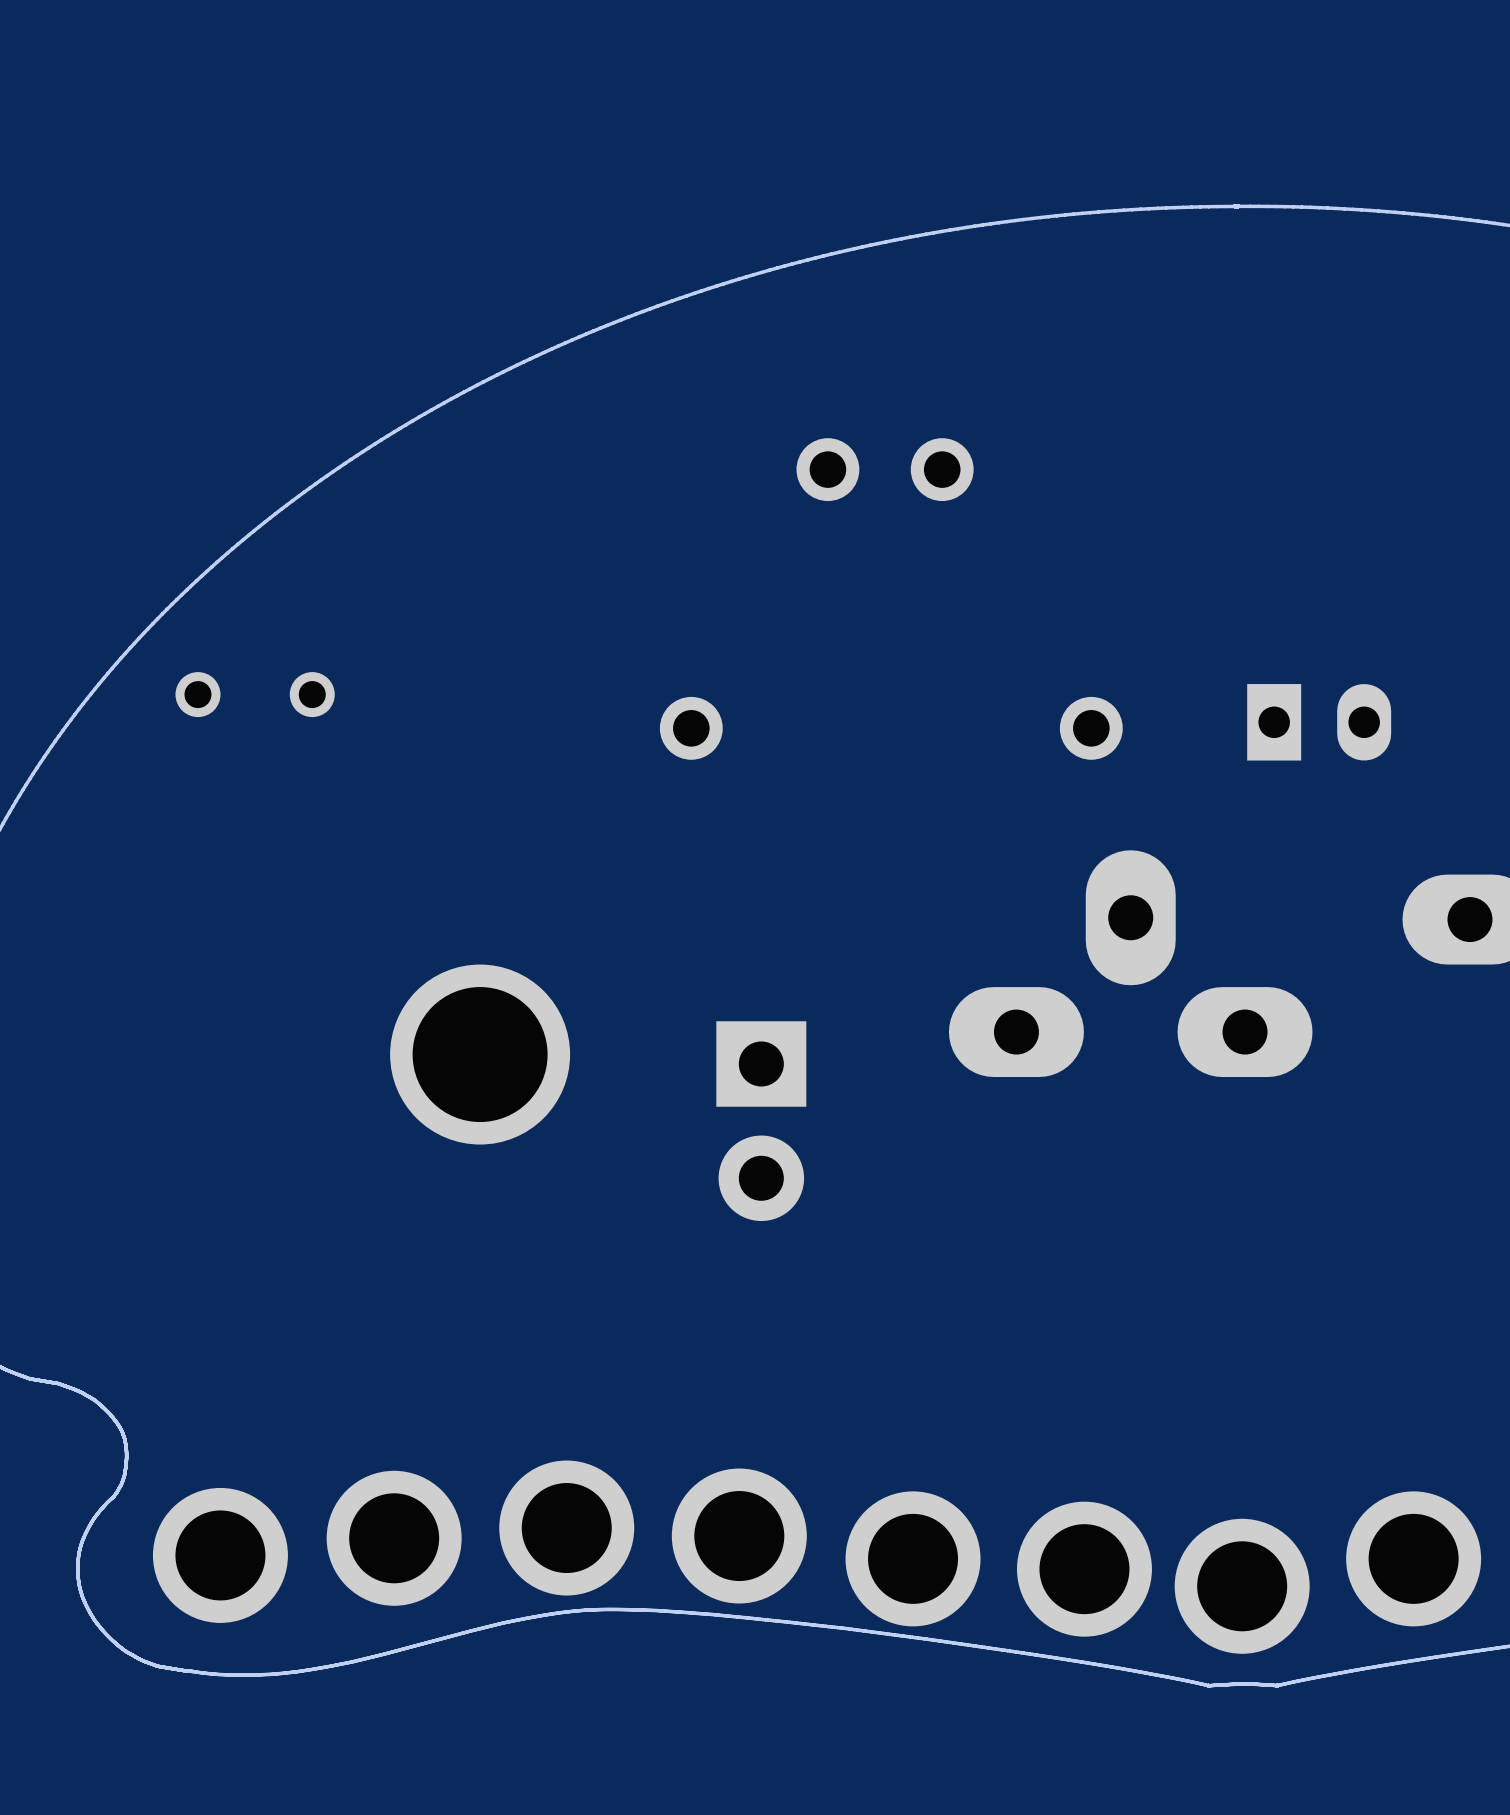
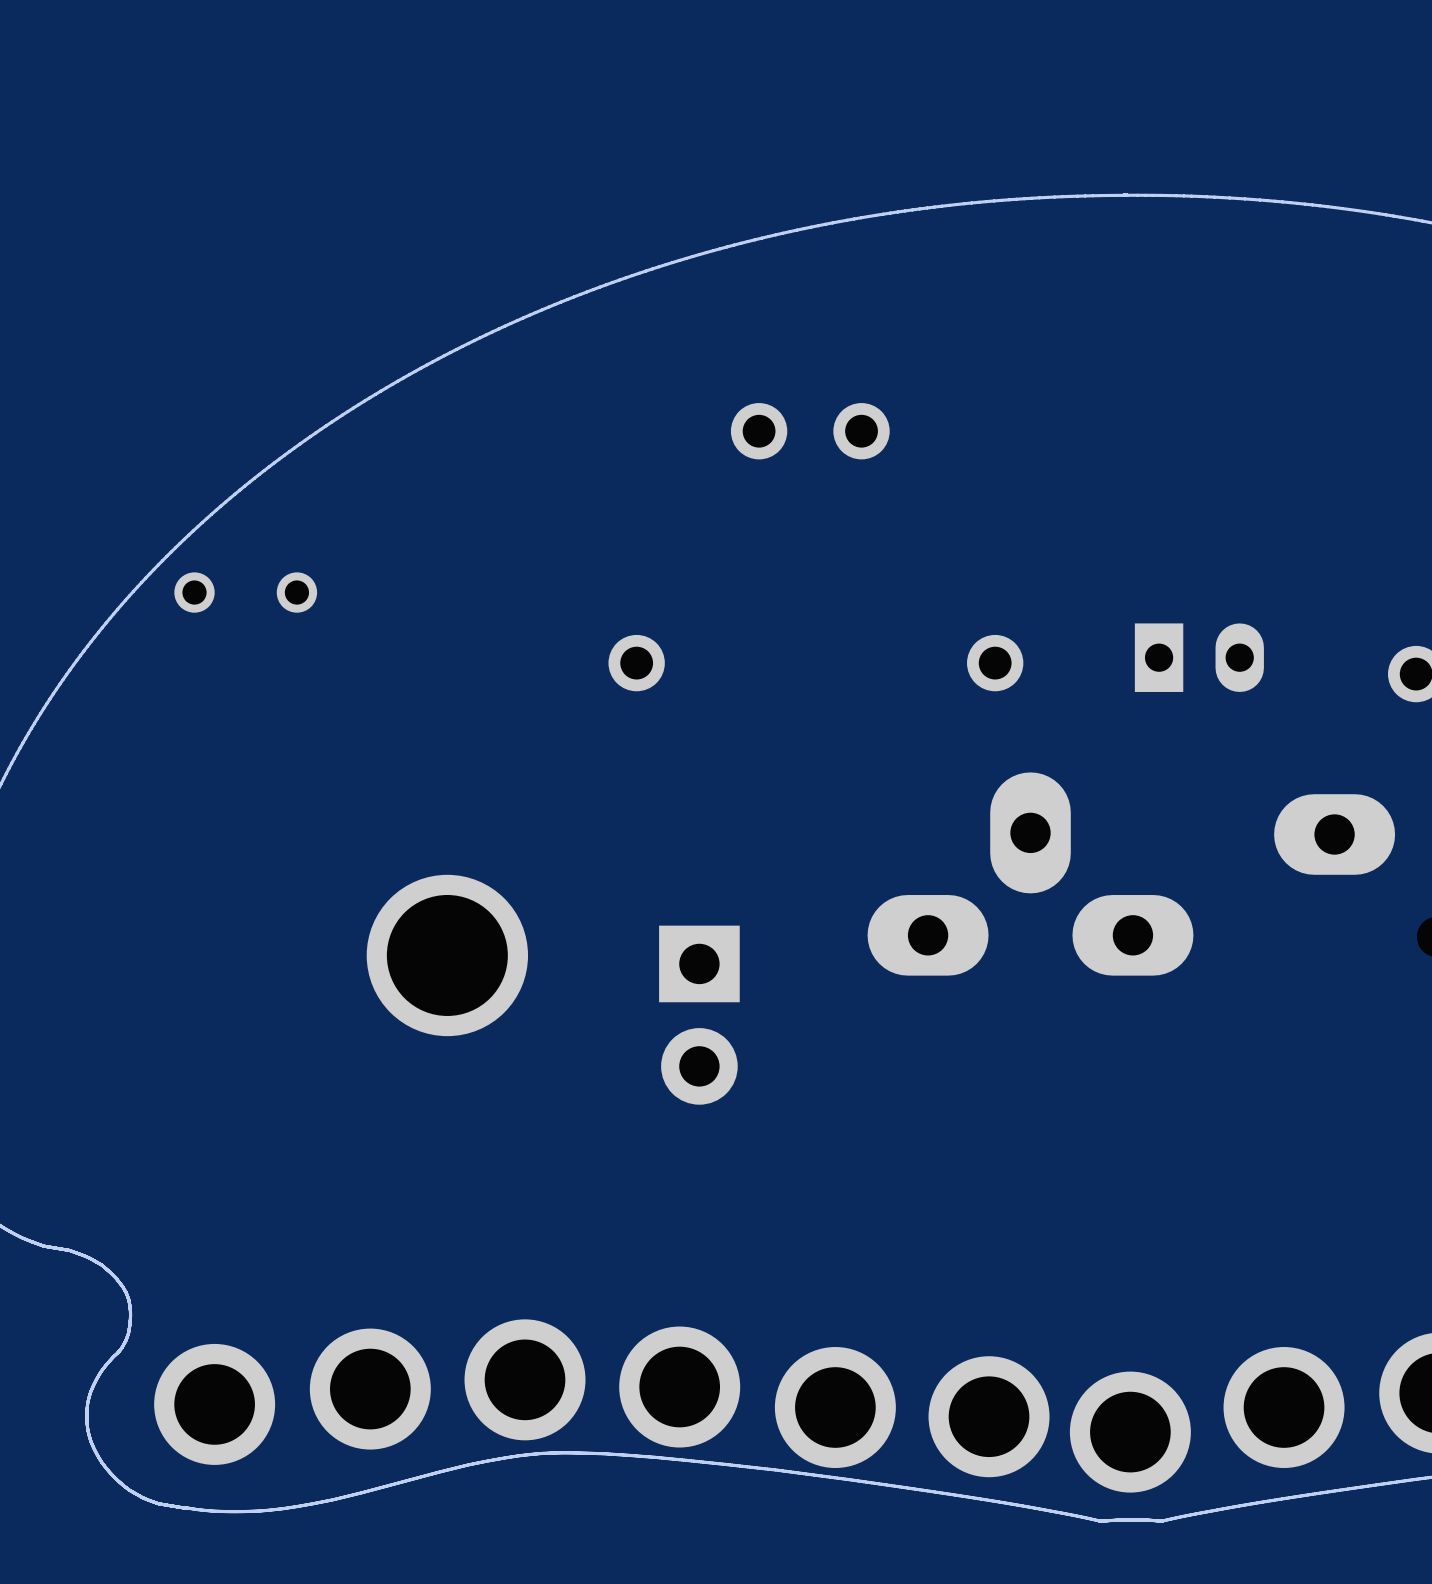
part position: (255, 694) -> (245, 592)

